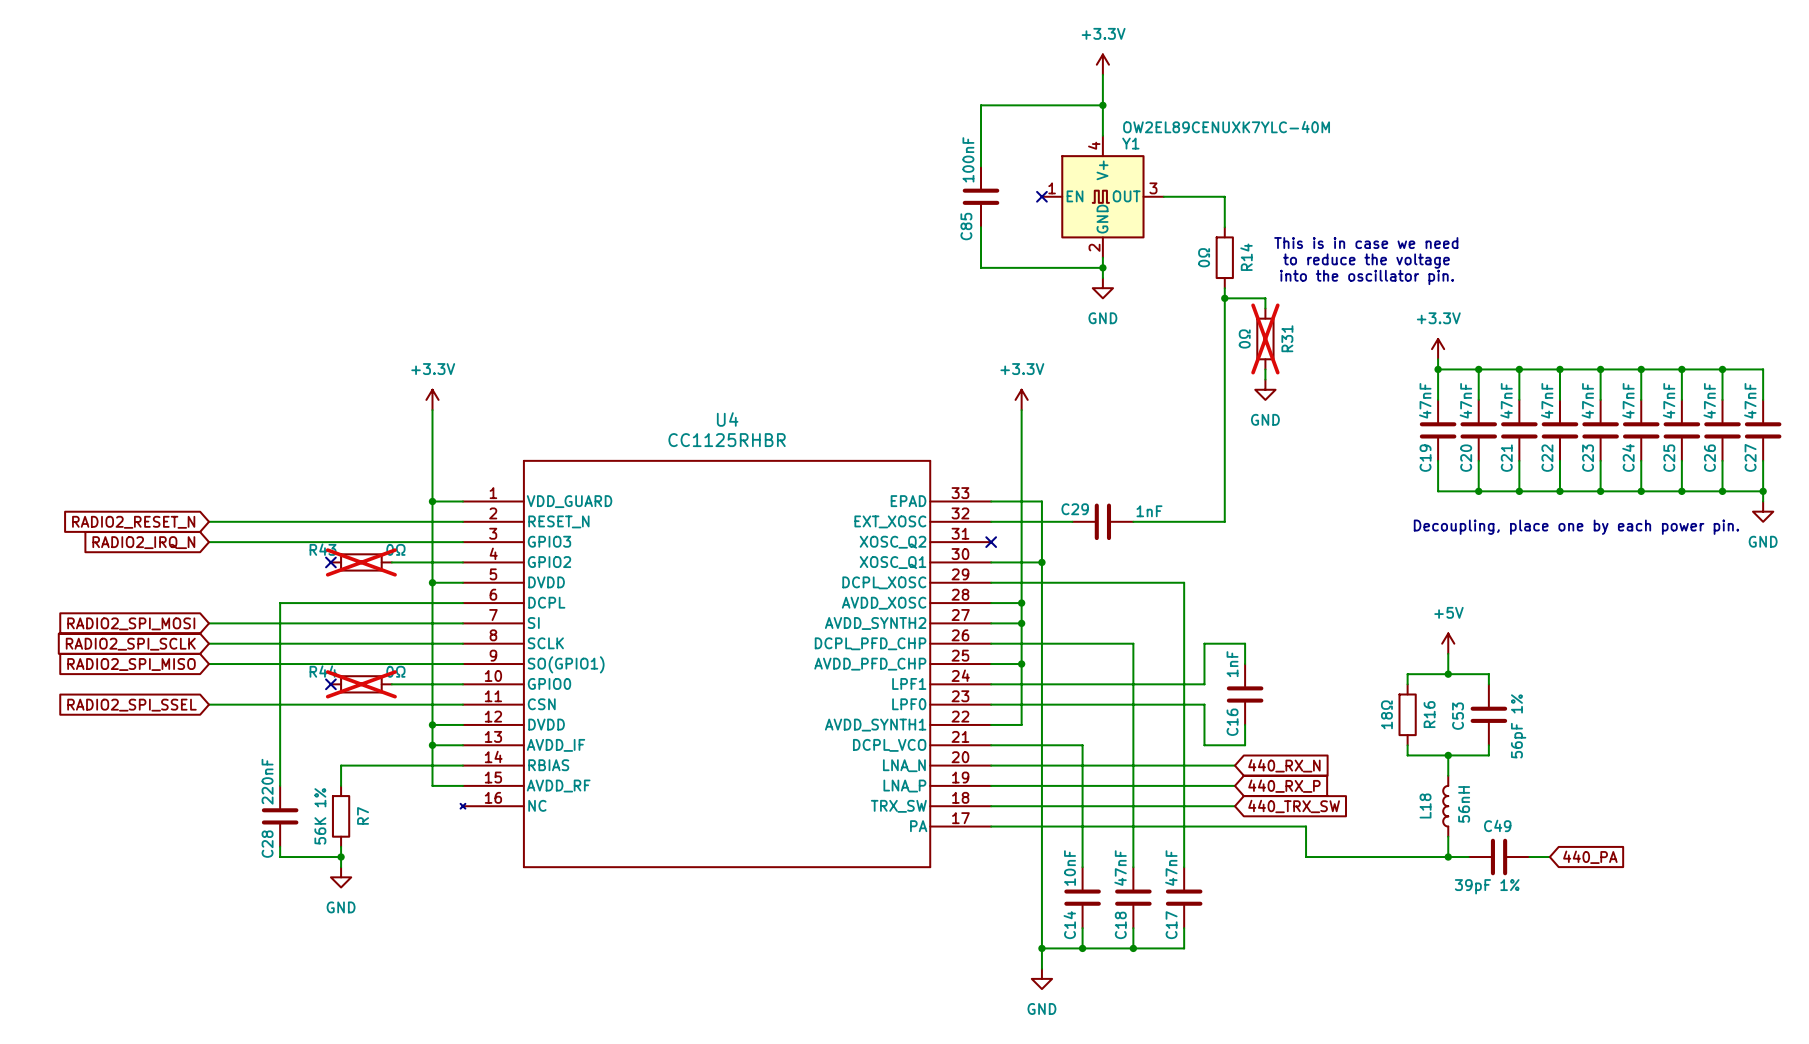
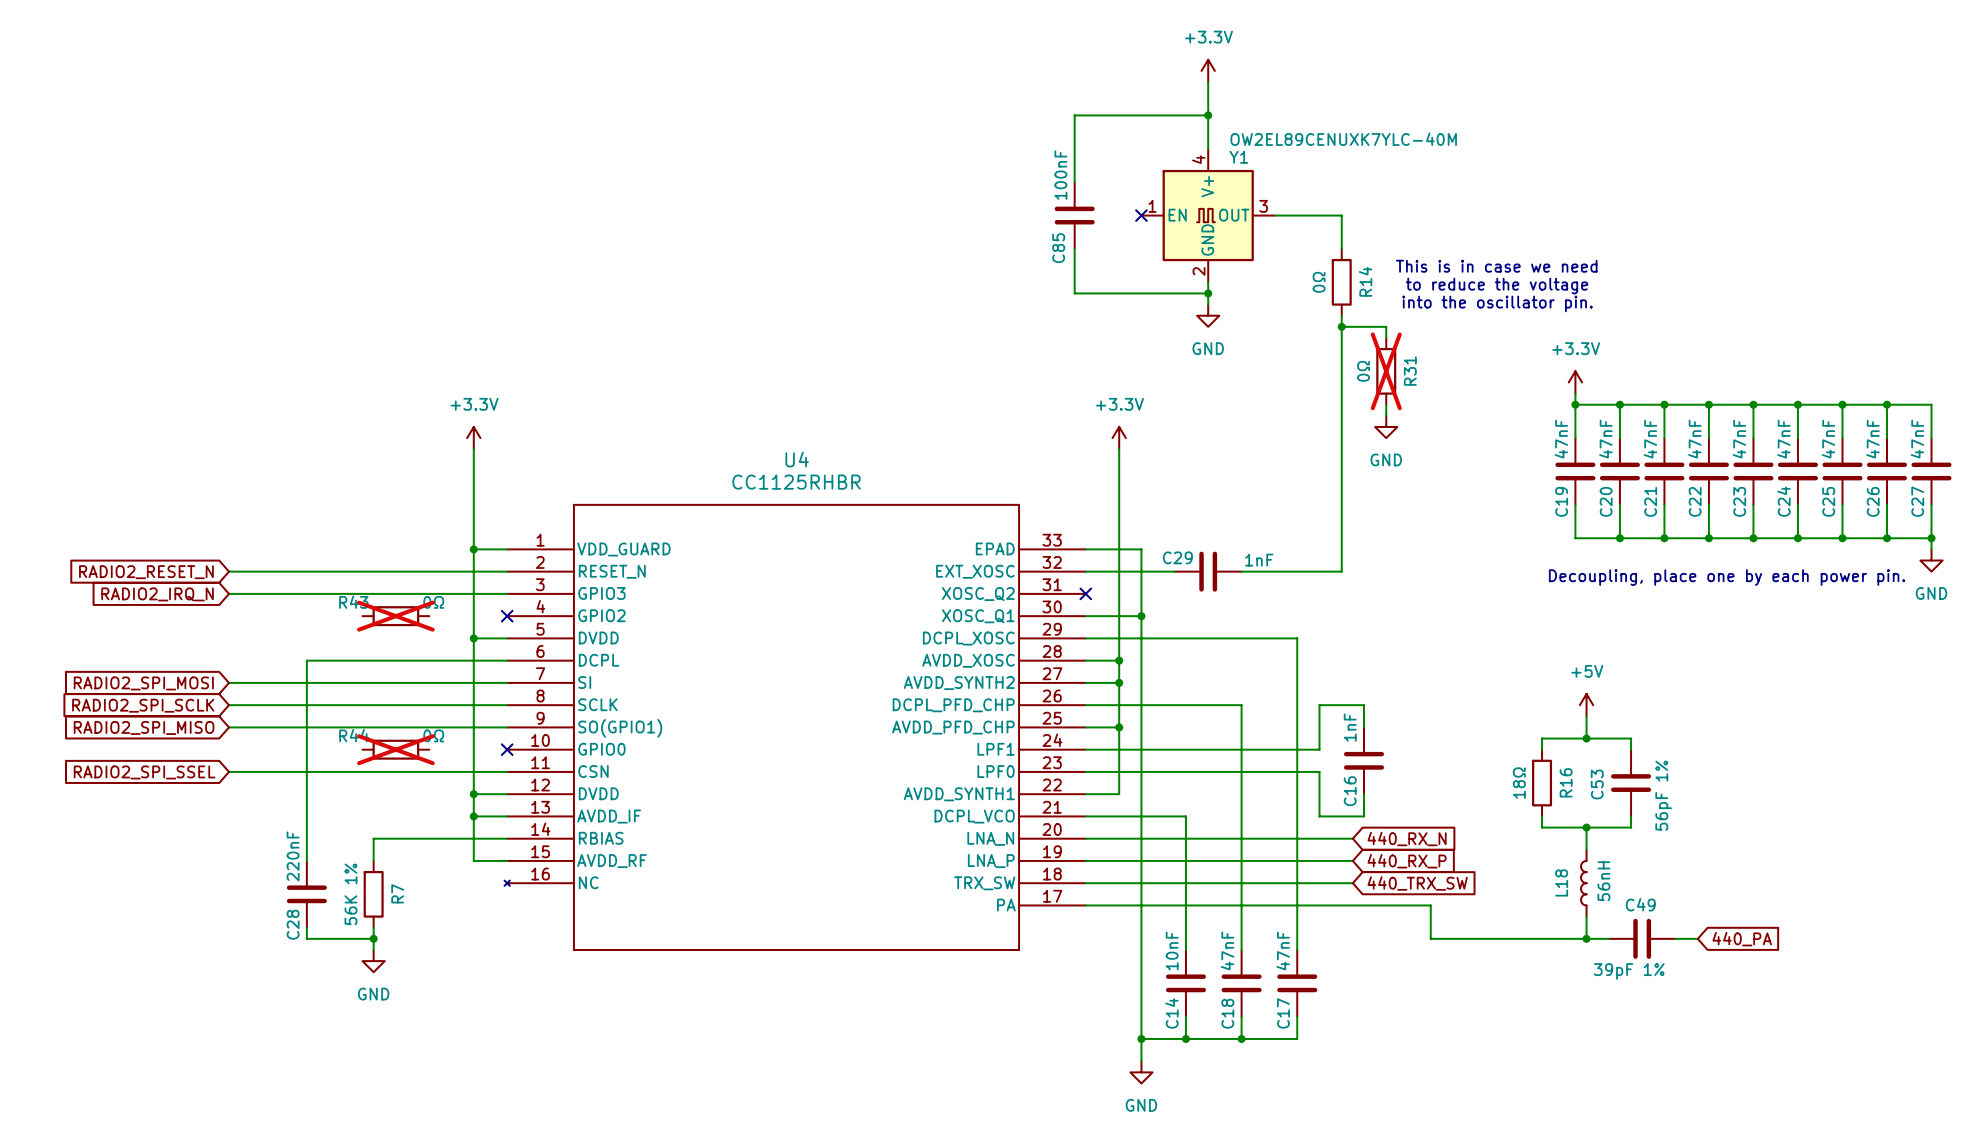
no-connect mark: (330, 562) -> none
wire: (391, 562) (462, 562) -> none
no-connect mark: none -> (507, 616)
no-connect mark: (330, 684) -> none
wire: (391, 684) (462, 684) -> none
no-connect mark: none -> (507, 749)

